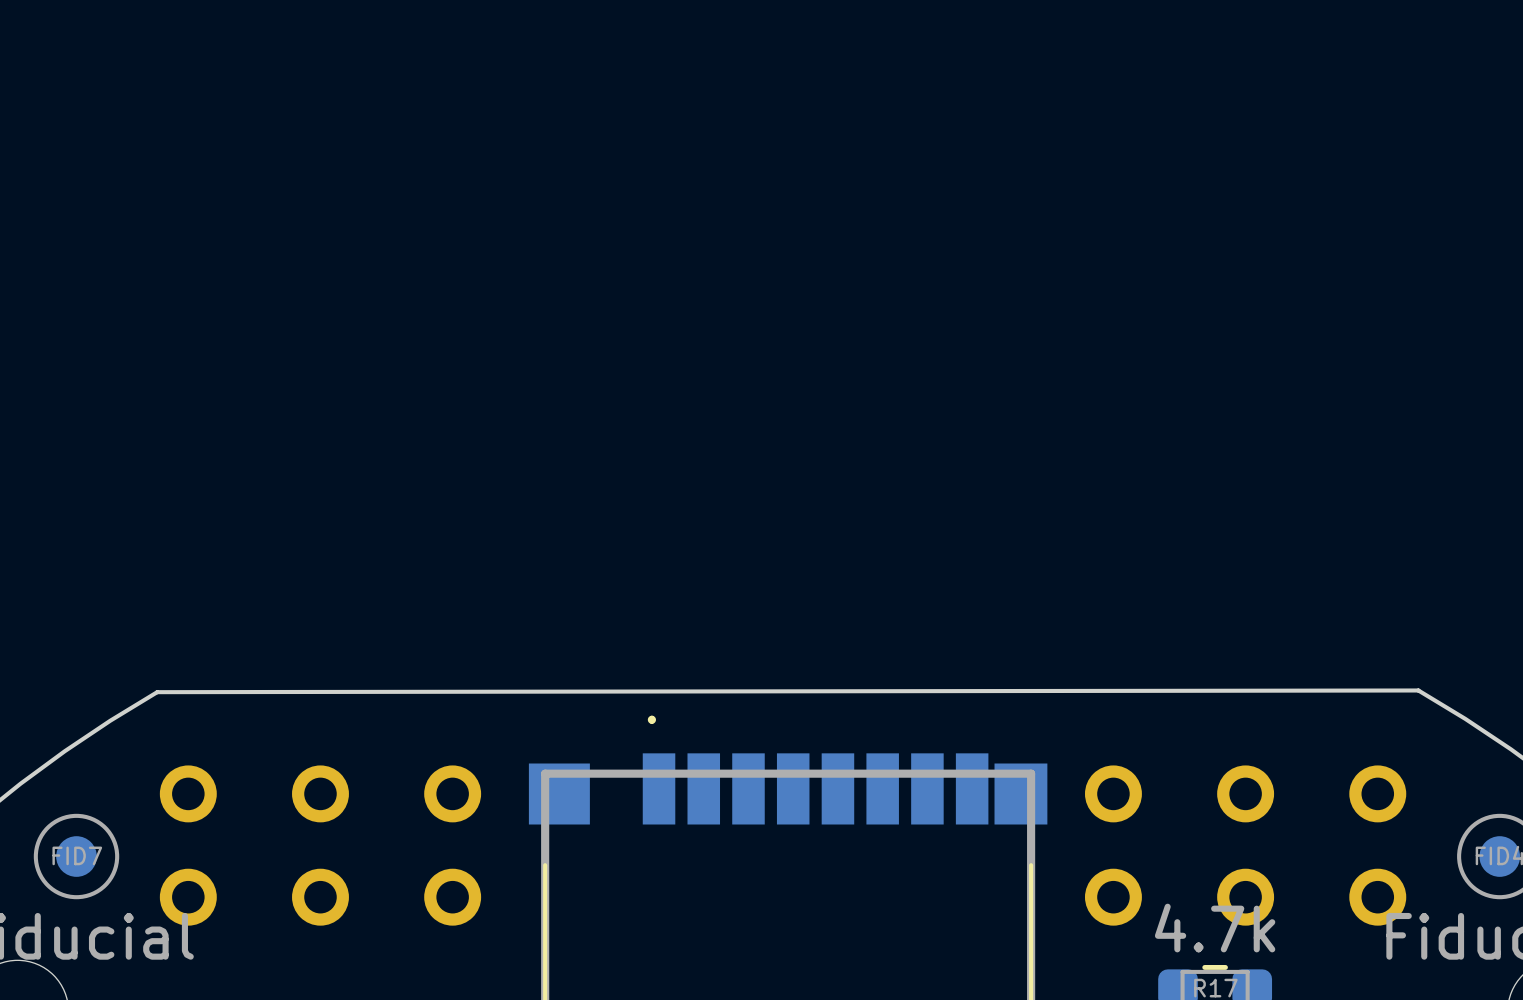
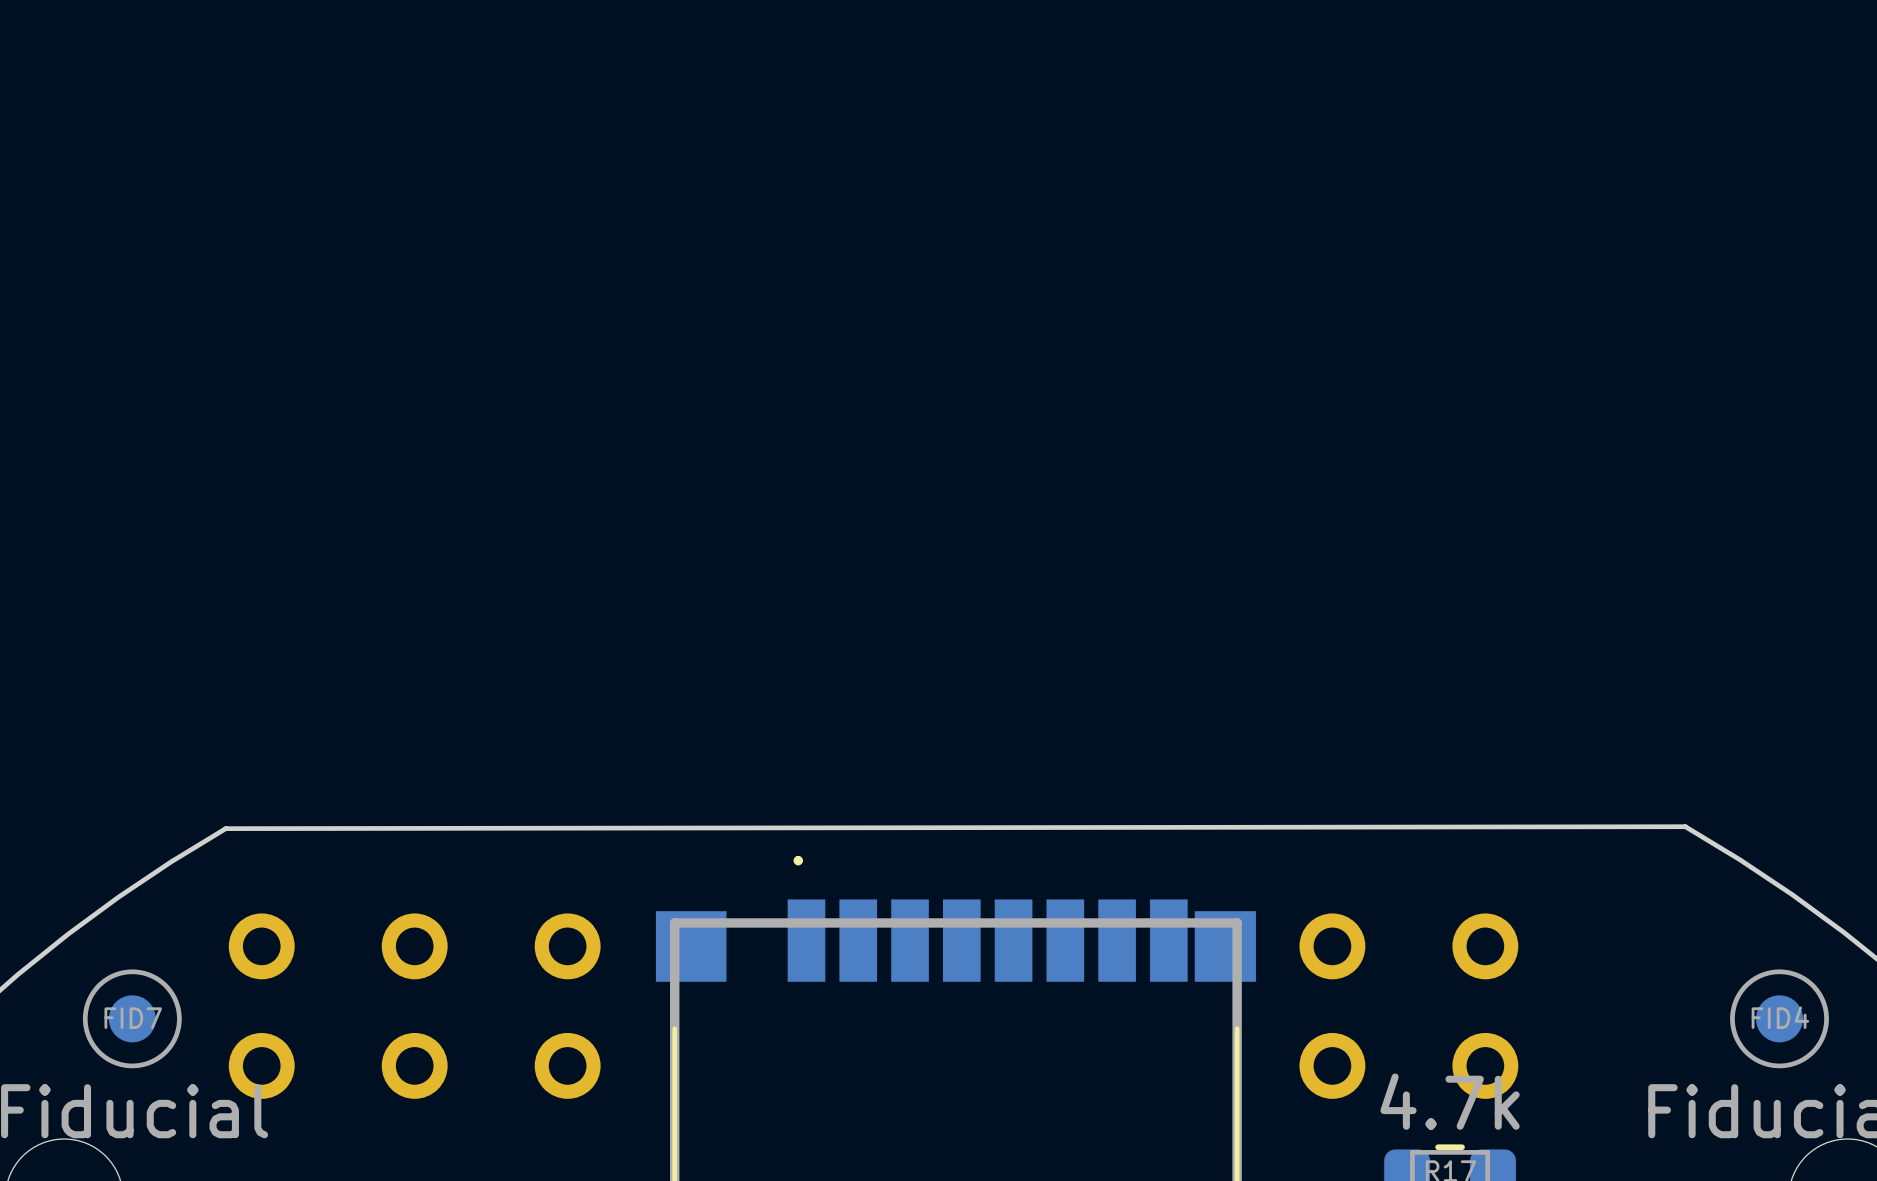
part: (1377, 845) -> none

